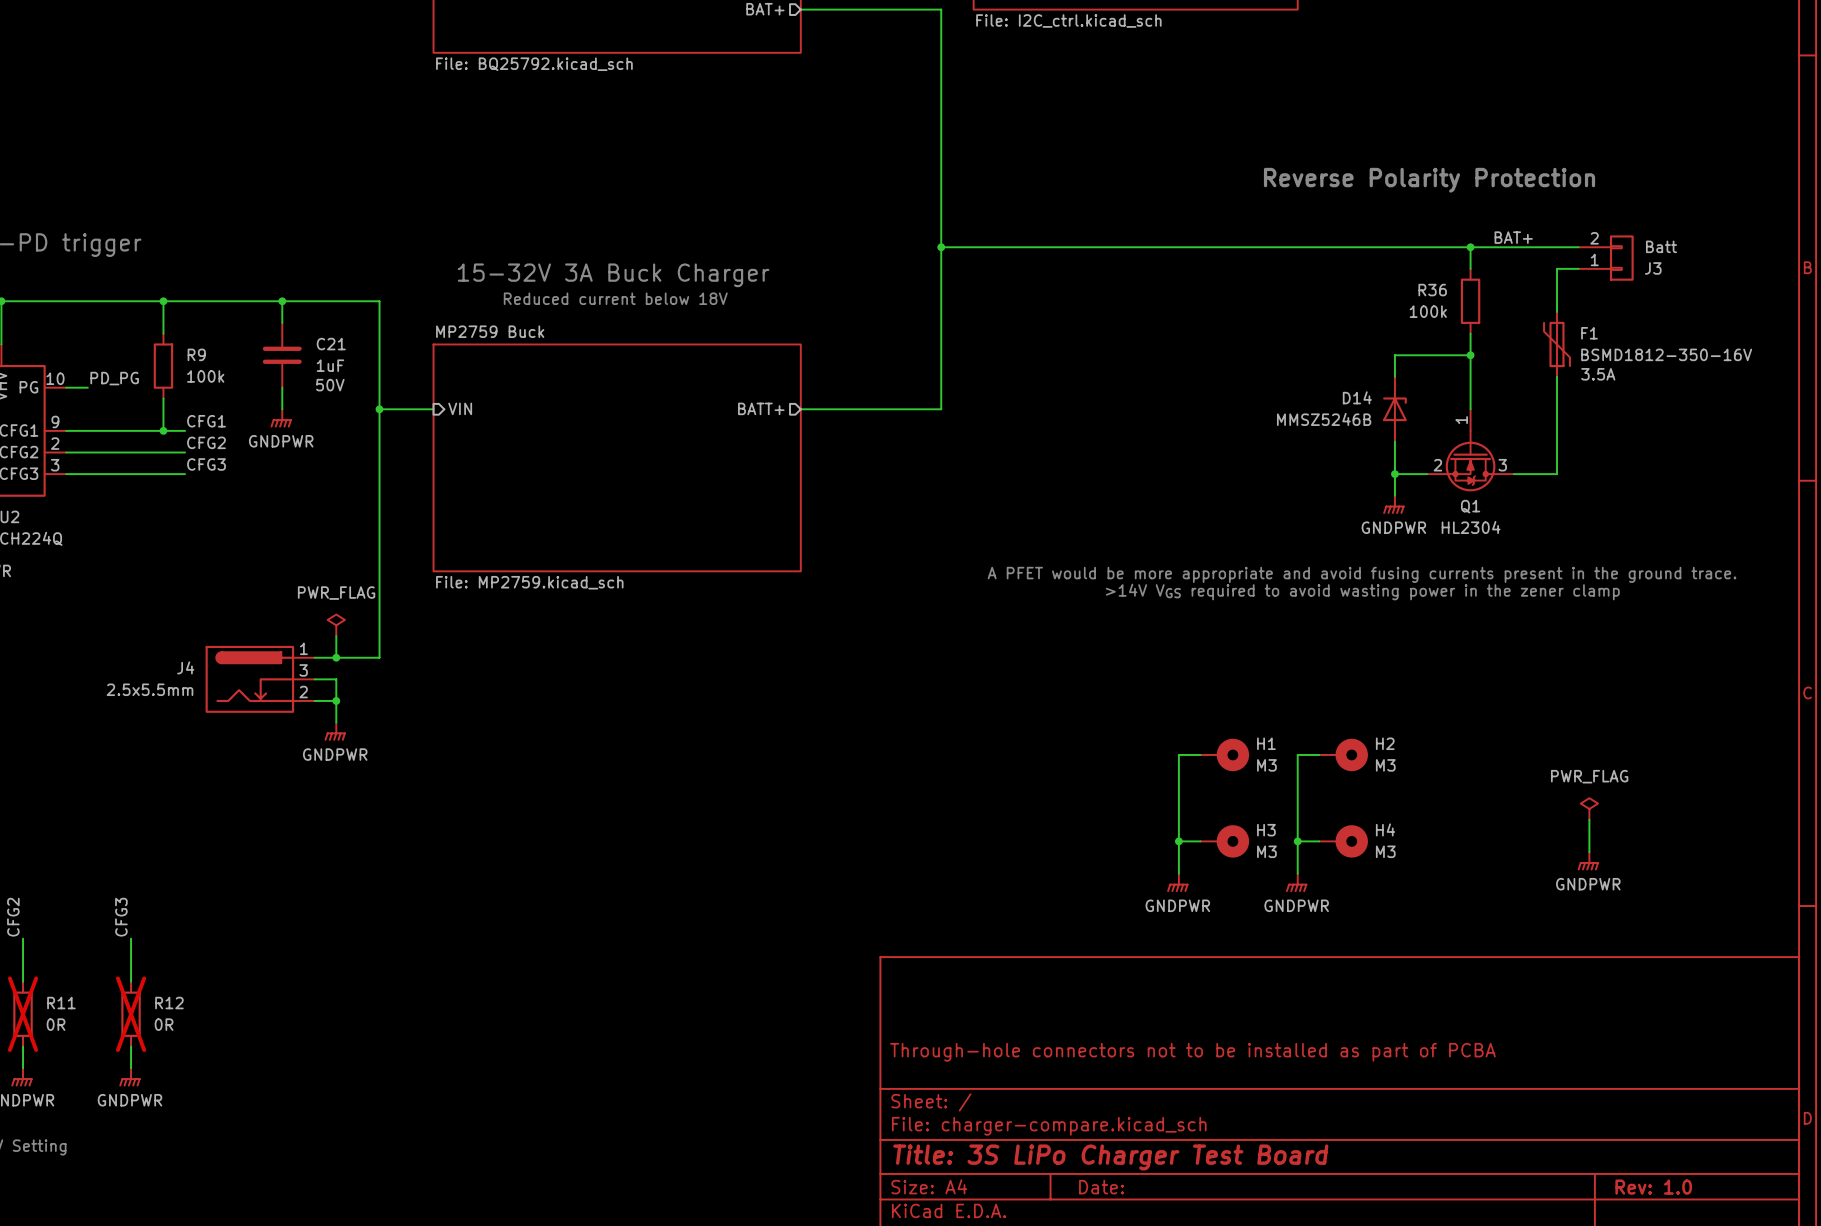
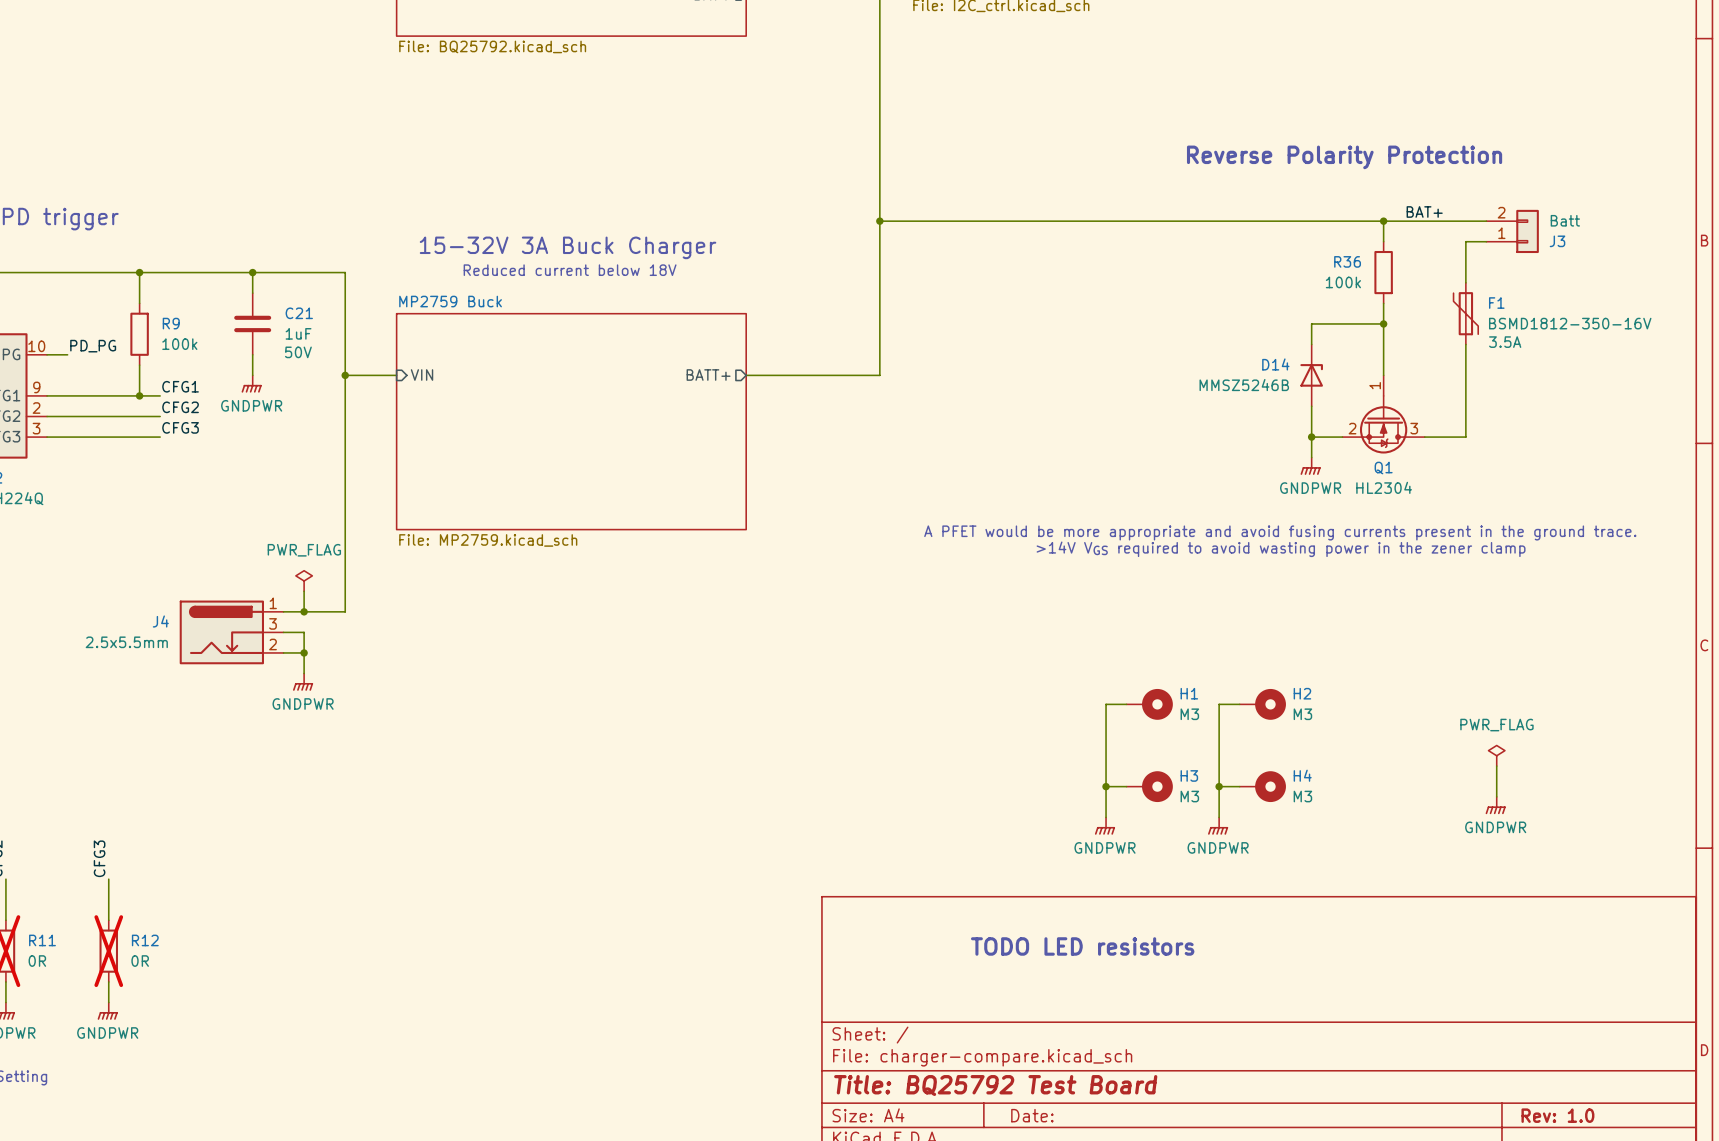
text: none -> TODO LED resistors (1082, 946)
title block: Through-hole connectors not to be installed as part of PCBA (1192, 1052) -> none
title block: Title: 3S LiPo Charger Test Board (1110, 1157) -> Title: BQ25792 Test Board (995, 1085)

